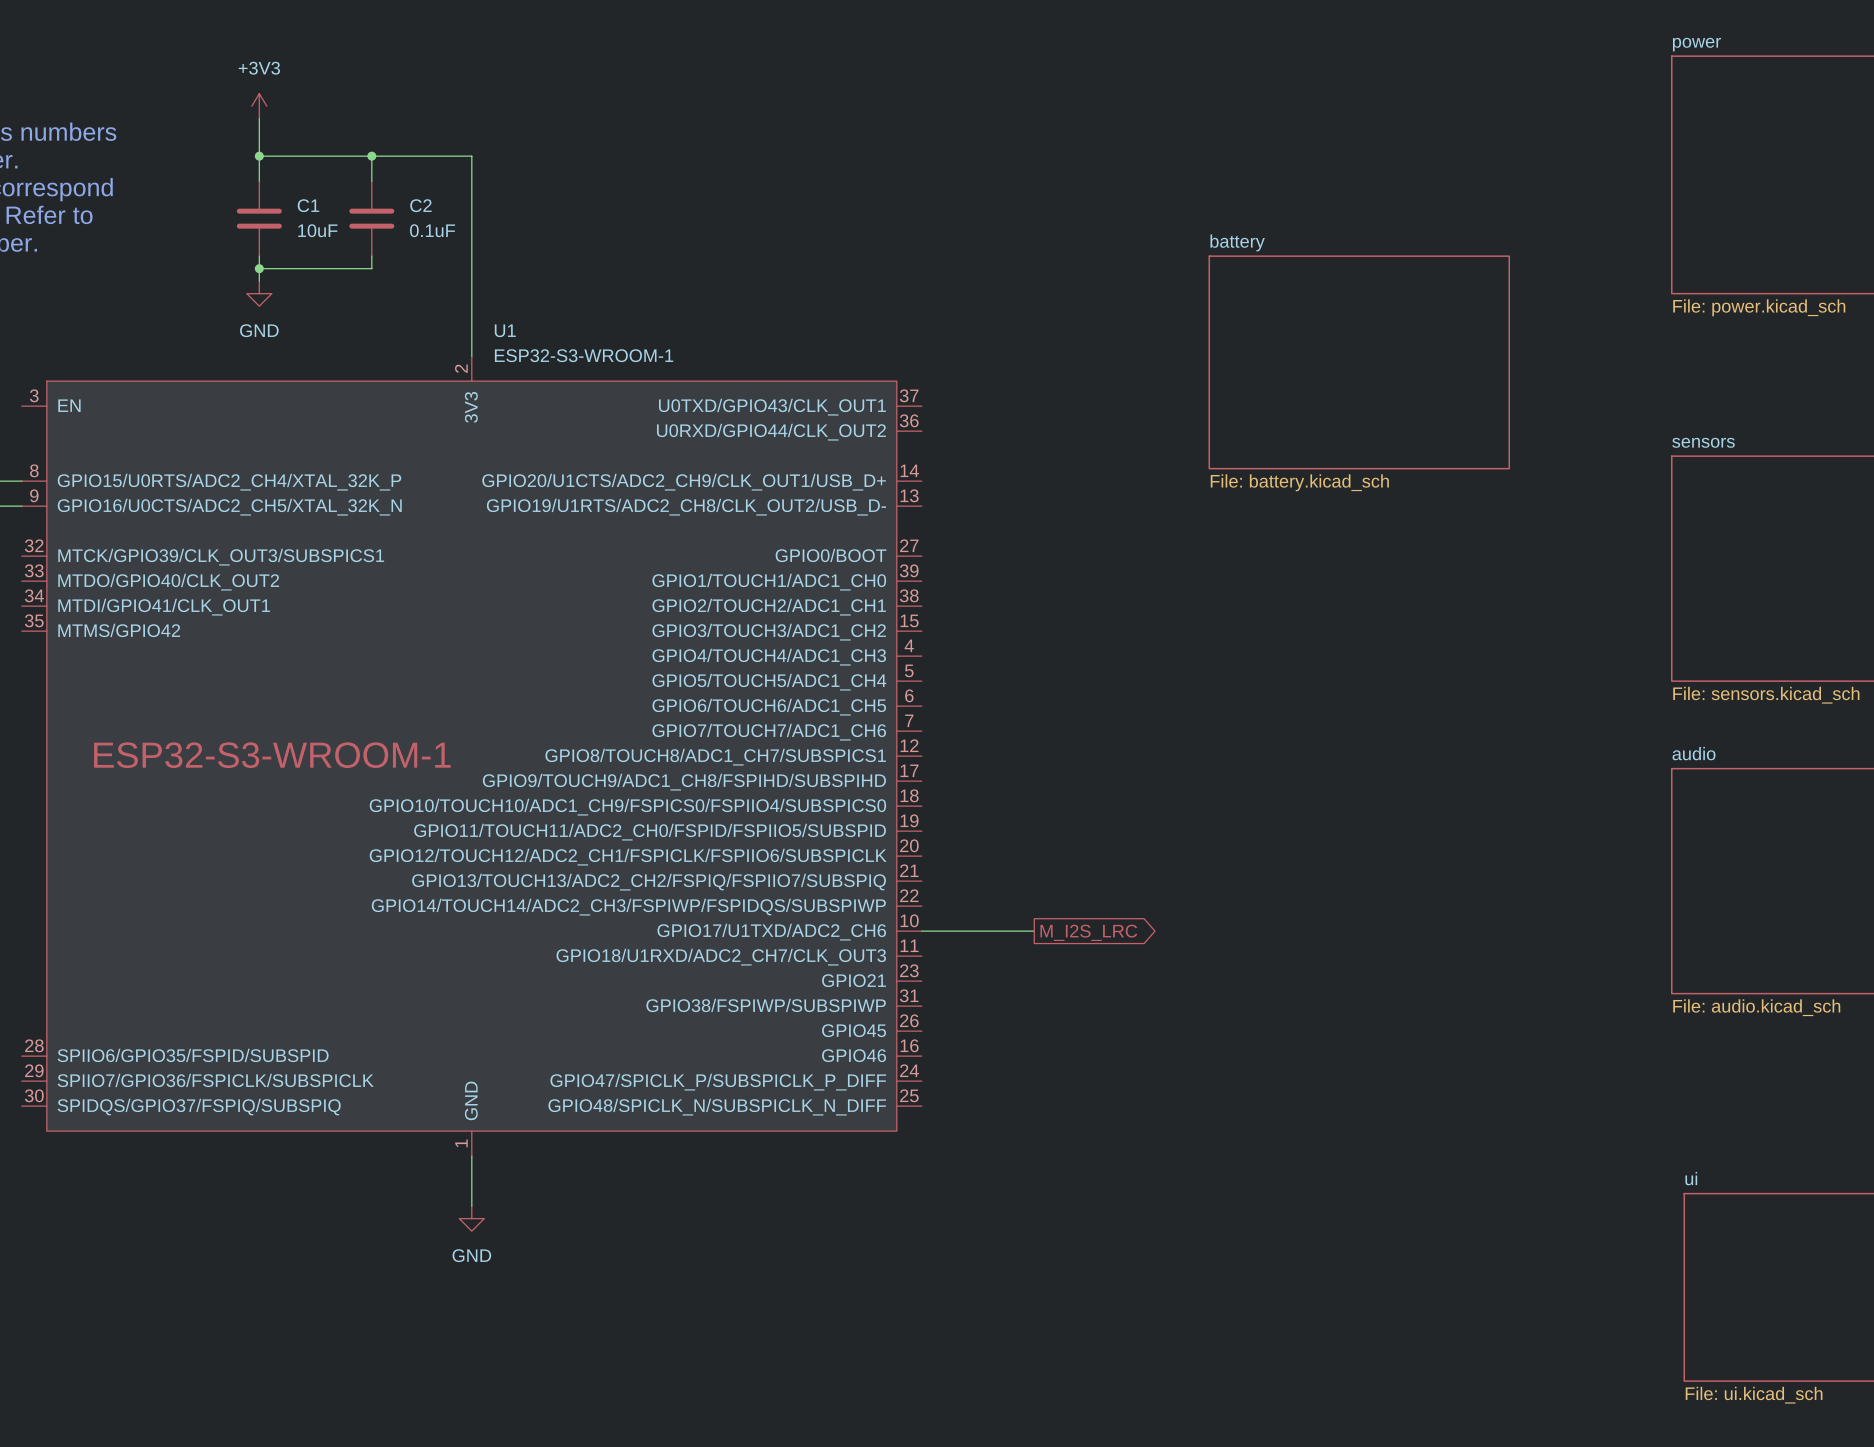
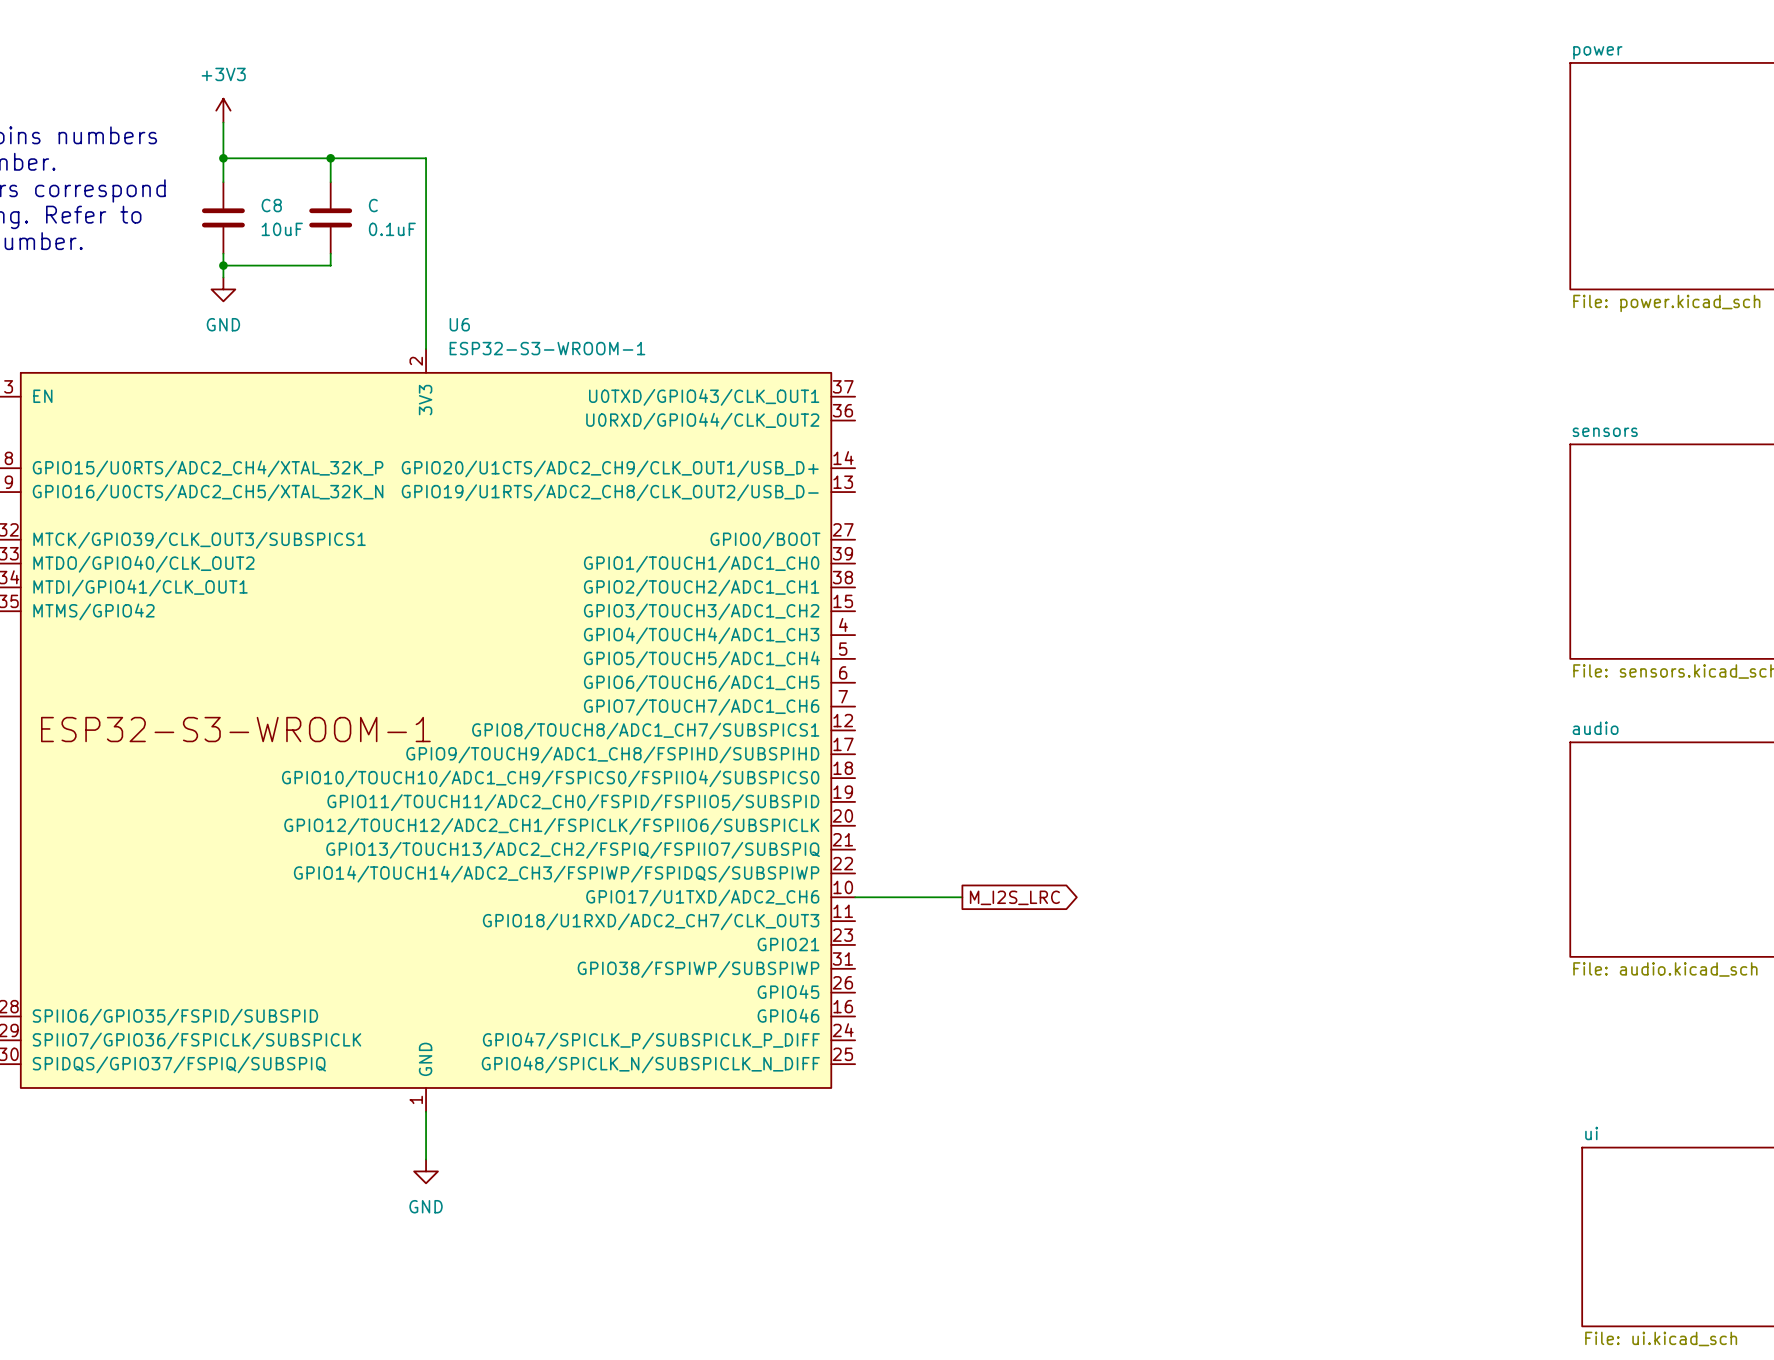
C1 name: C1 (308, 205) -> C8 (271, 205)
C2 name: C2 (420, 205) -> C (373, 205)
U1 name: U1 (505, 330) -> U6 (459, 324)
sheet battery: File: battery.kicad_sch (1359, 362) -> none

